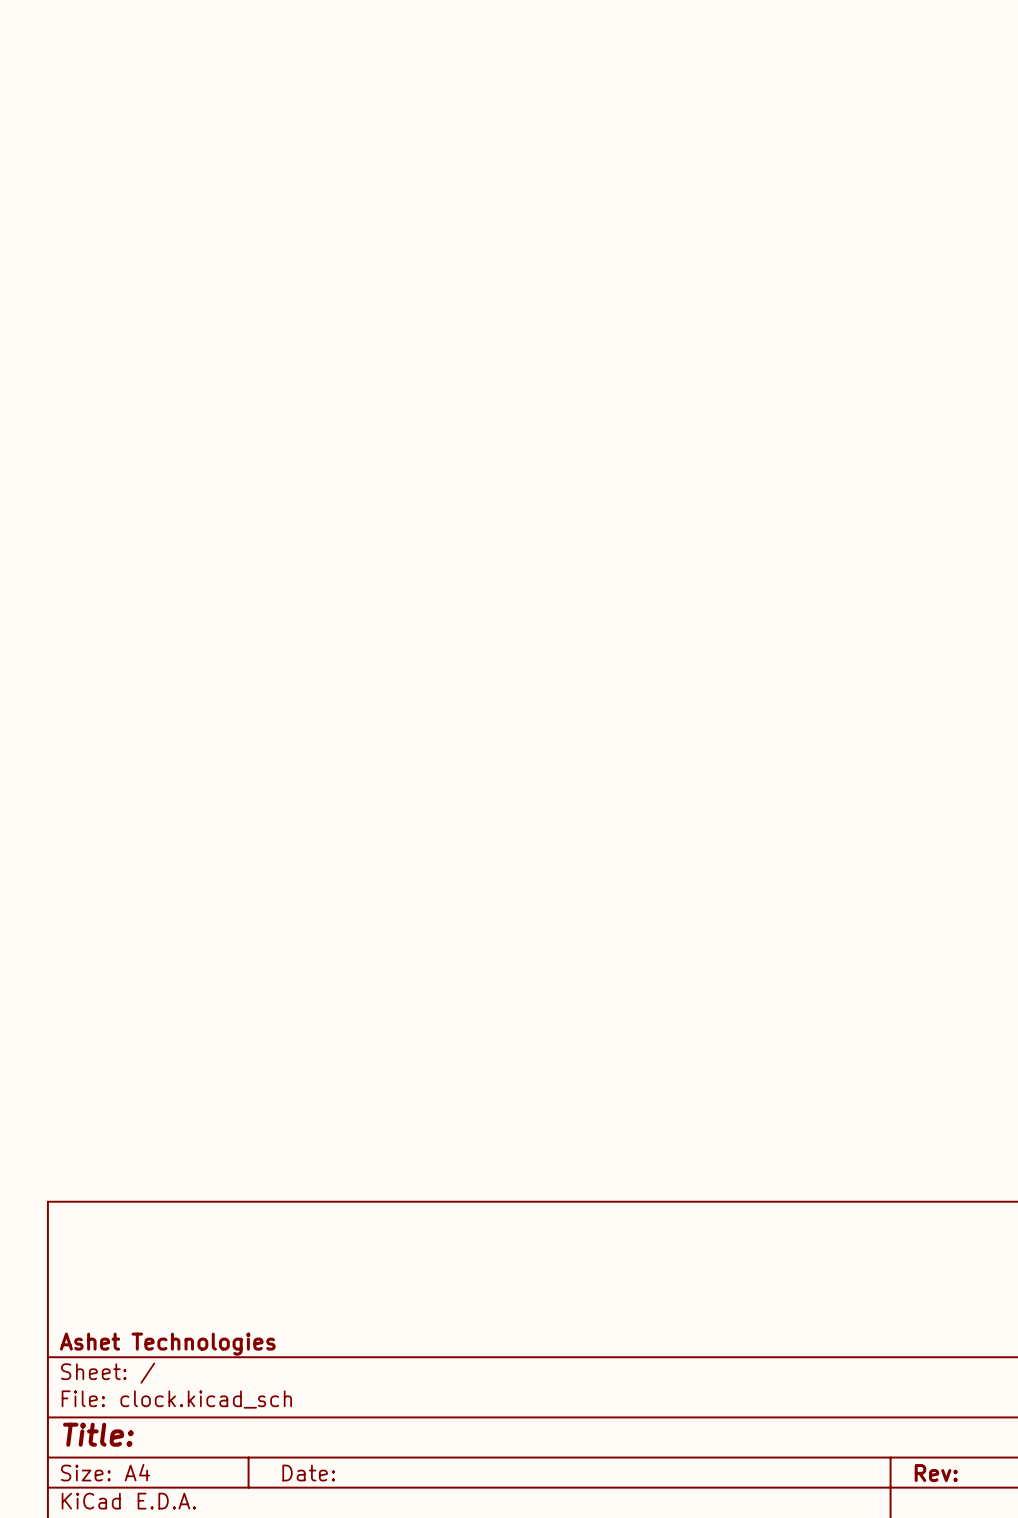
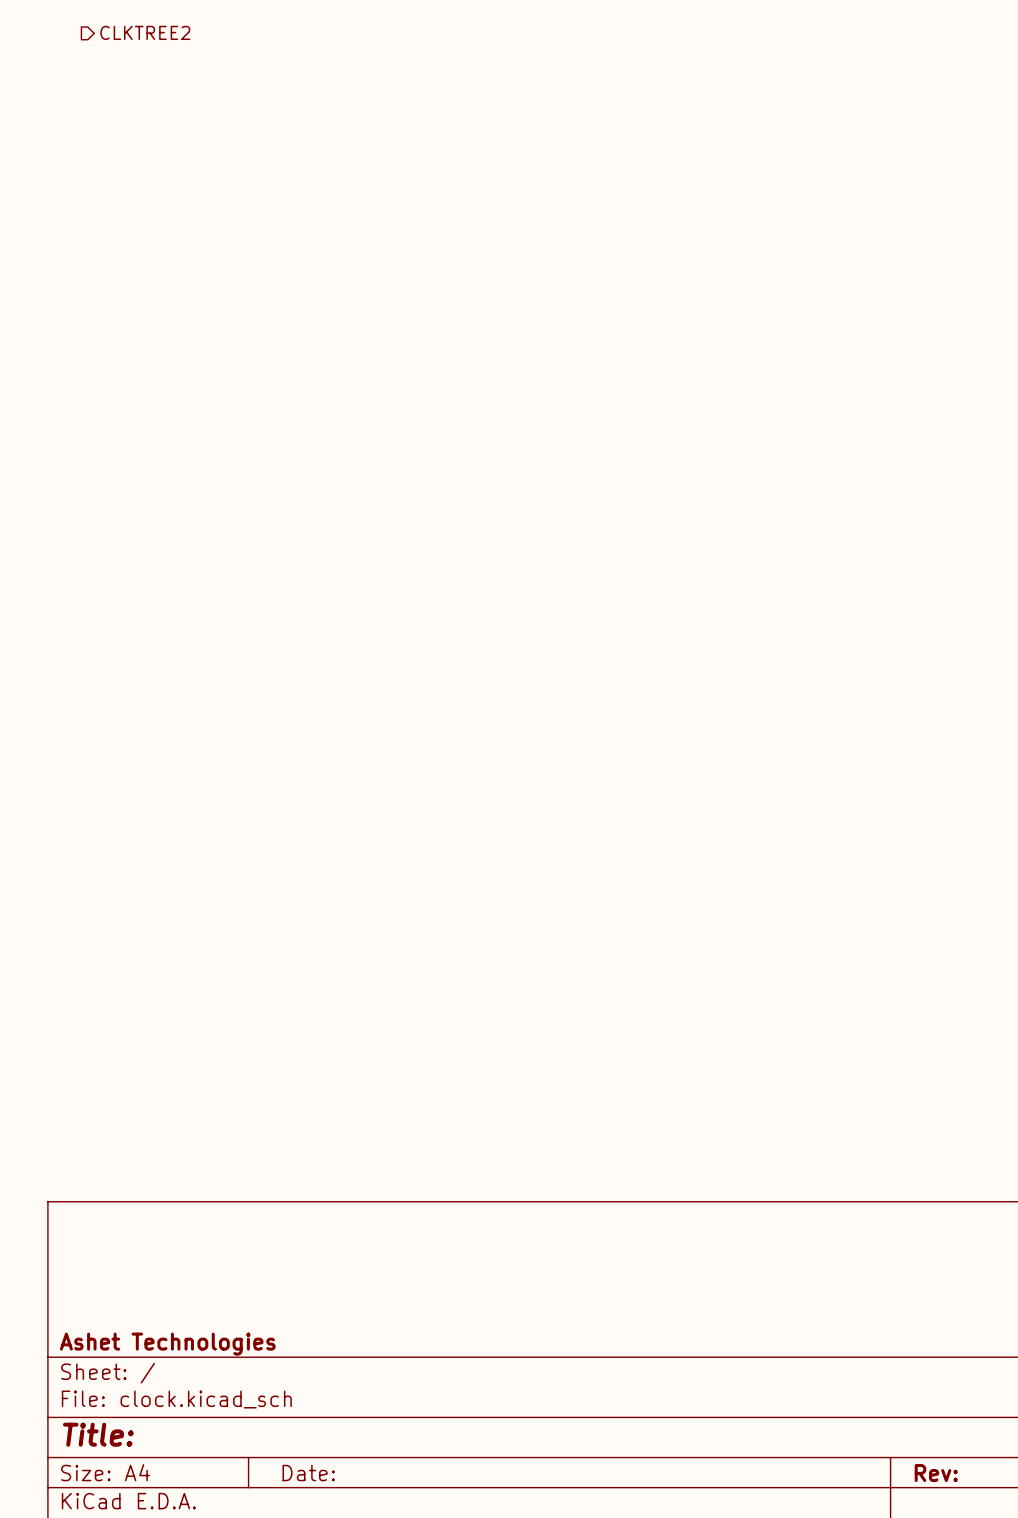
hierarchical label: none -> CLKTREE2 (145, 32)

